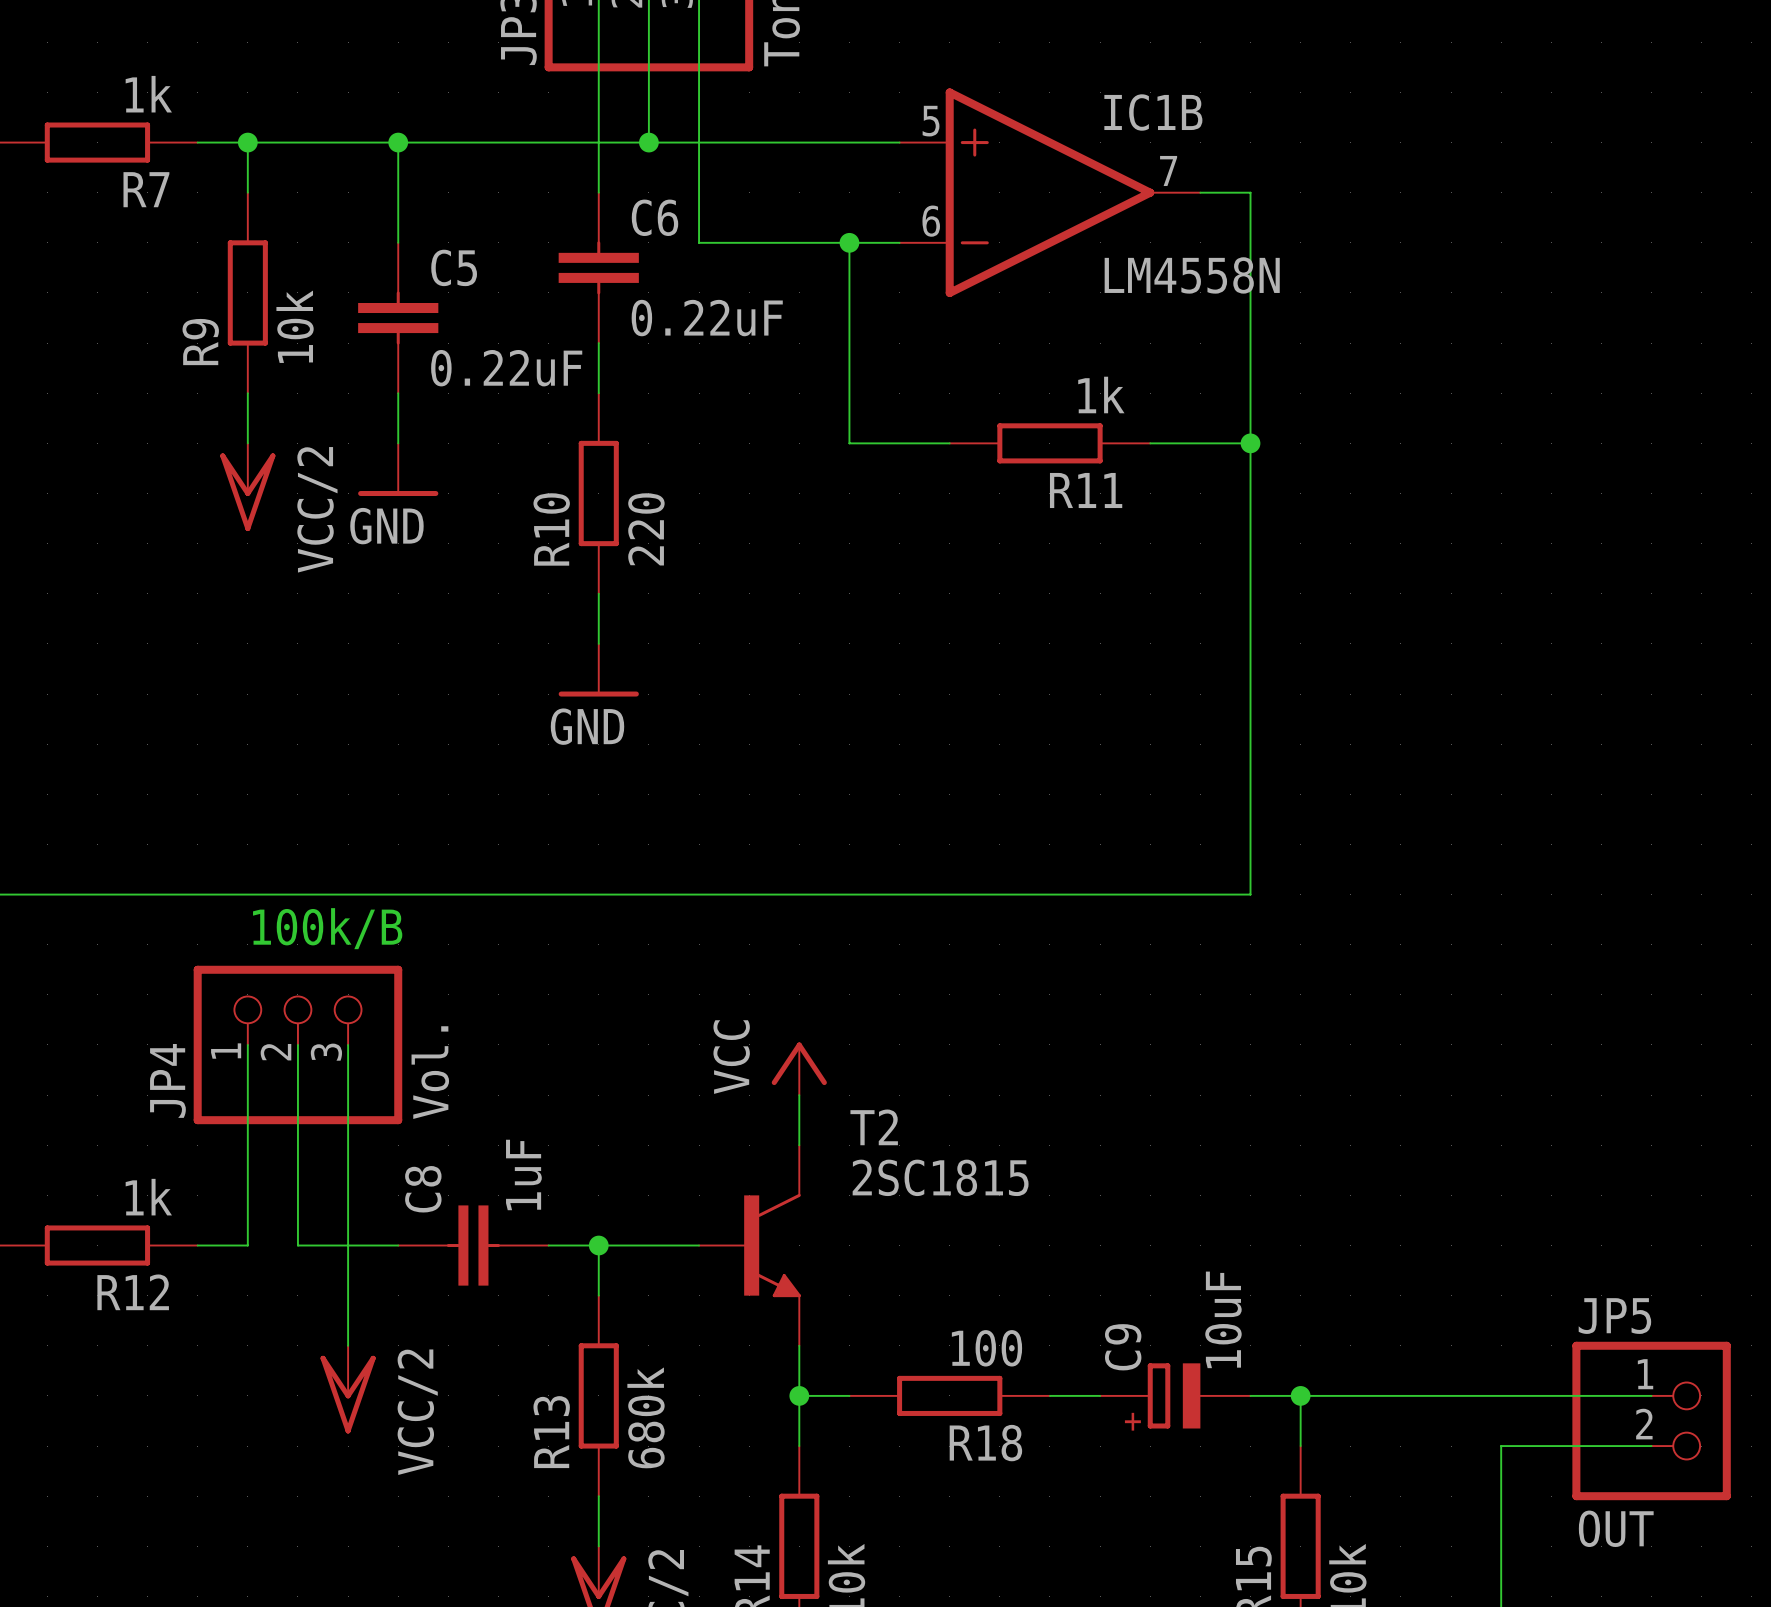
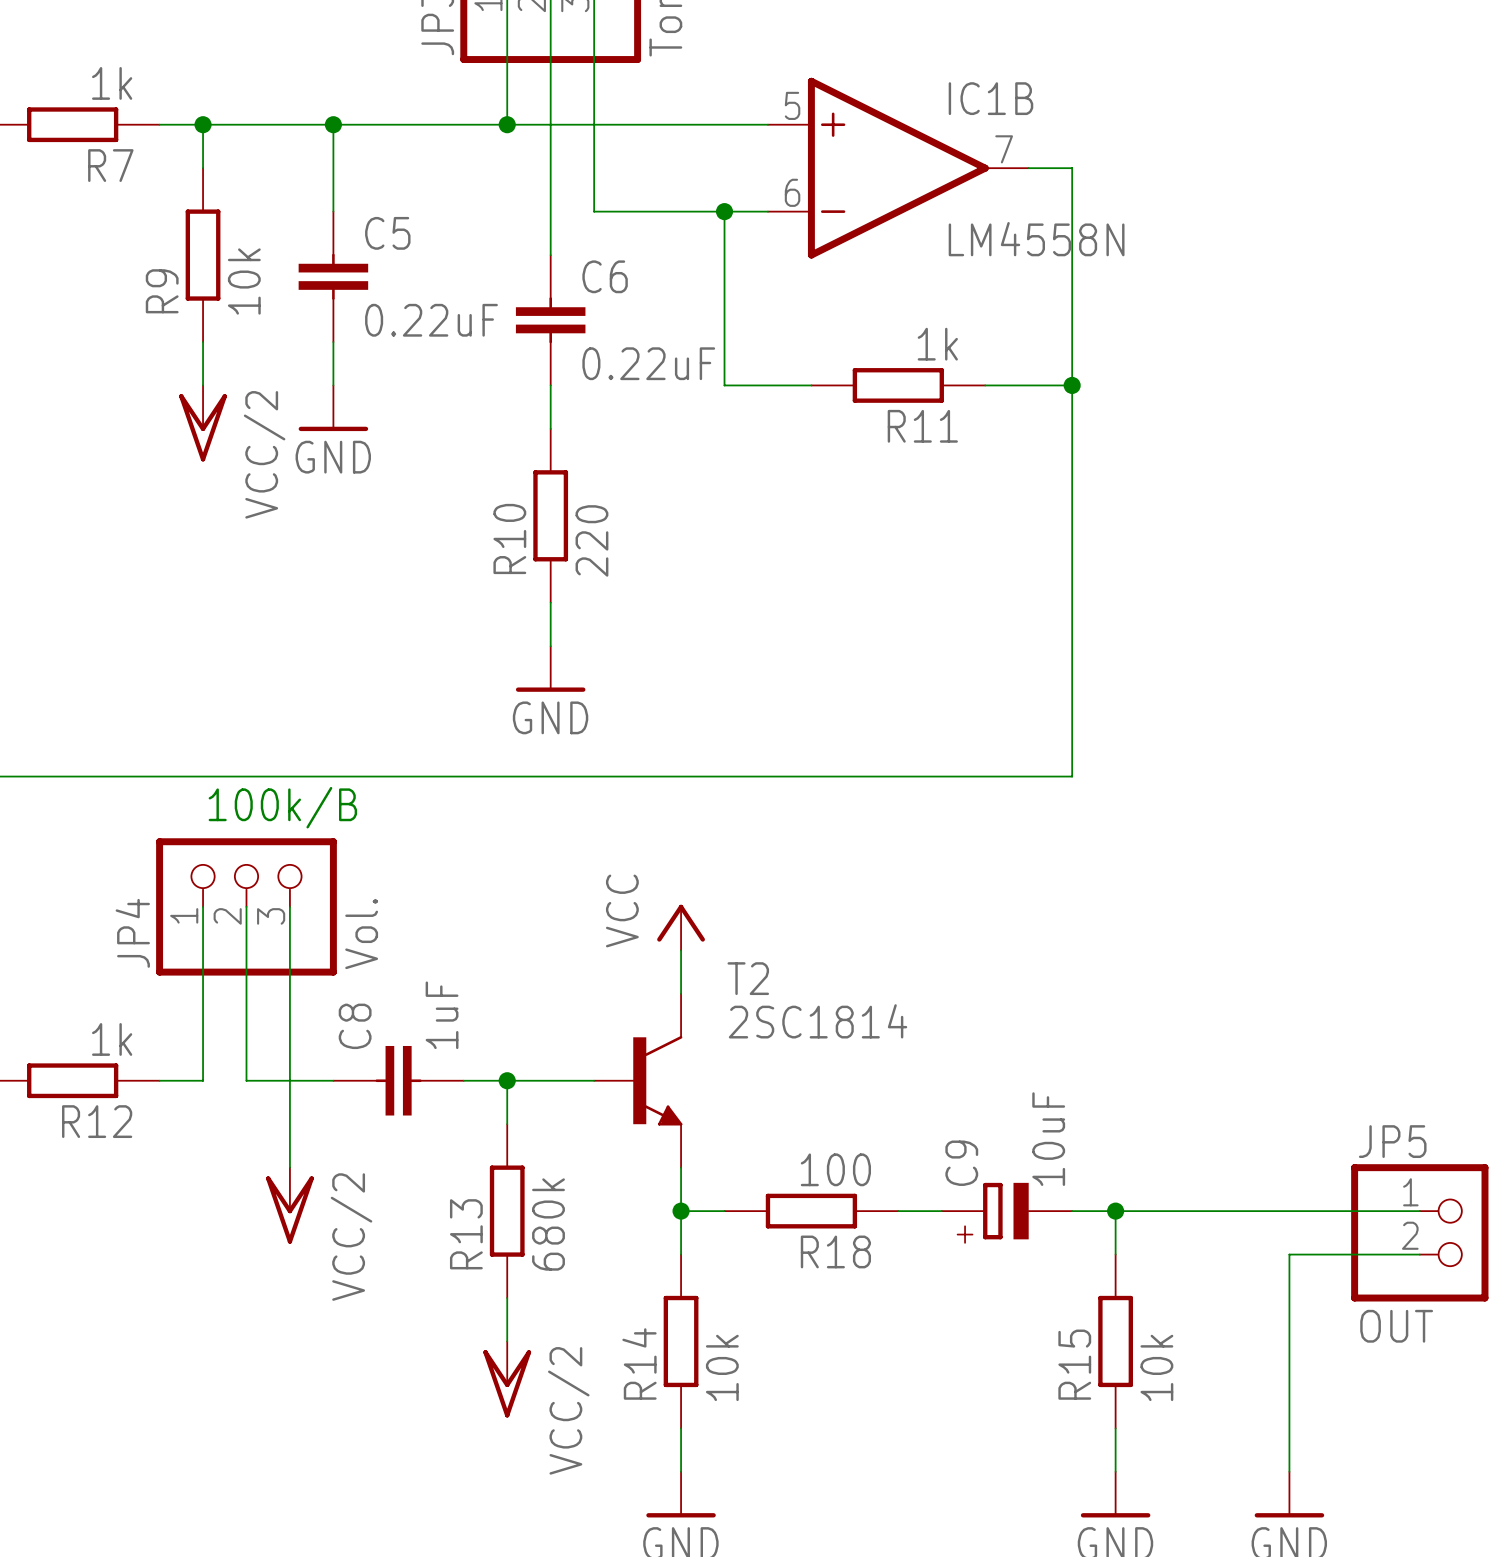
wire: (598, 142) (598, 192) -> none
wire: none -> (550, 124) (550, 255)
junction position: (648, 142) -> (507, 124)
C6 position: (598, 267) -> (550, 320)
wire: (598, 343) (598, 393) -> (550, 385) (550, 428)
R10 position: (598, 493) -> (550, 515)
wire: (598, 593) (598, 643) -> (550, 602) (550, 646)
power symbol position: GND (598, 670) -> GND (550, 669)
T2 value: 2SC1815 (940, 1177) -> 2SC1814 (818, 1021)

